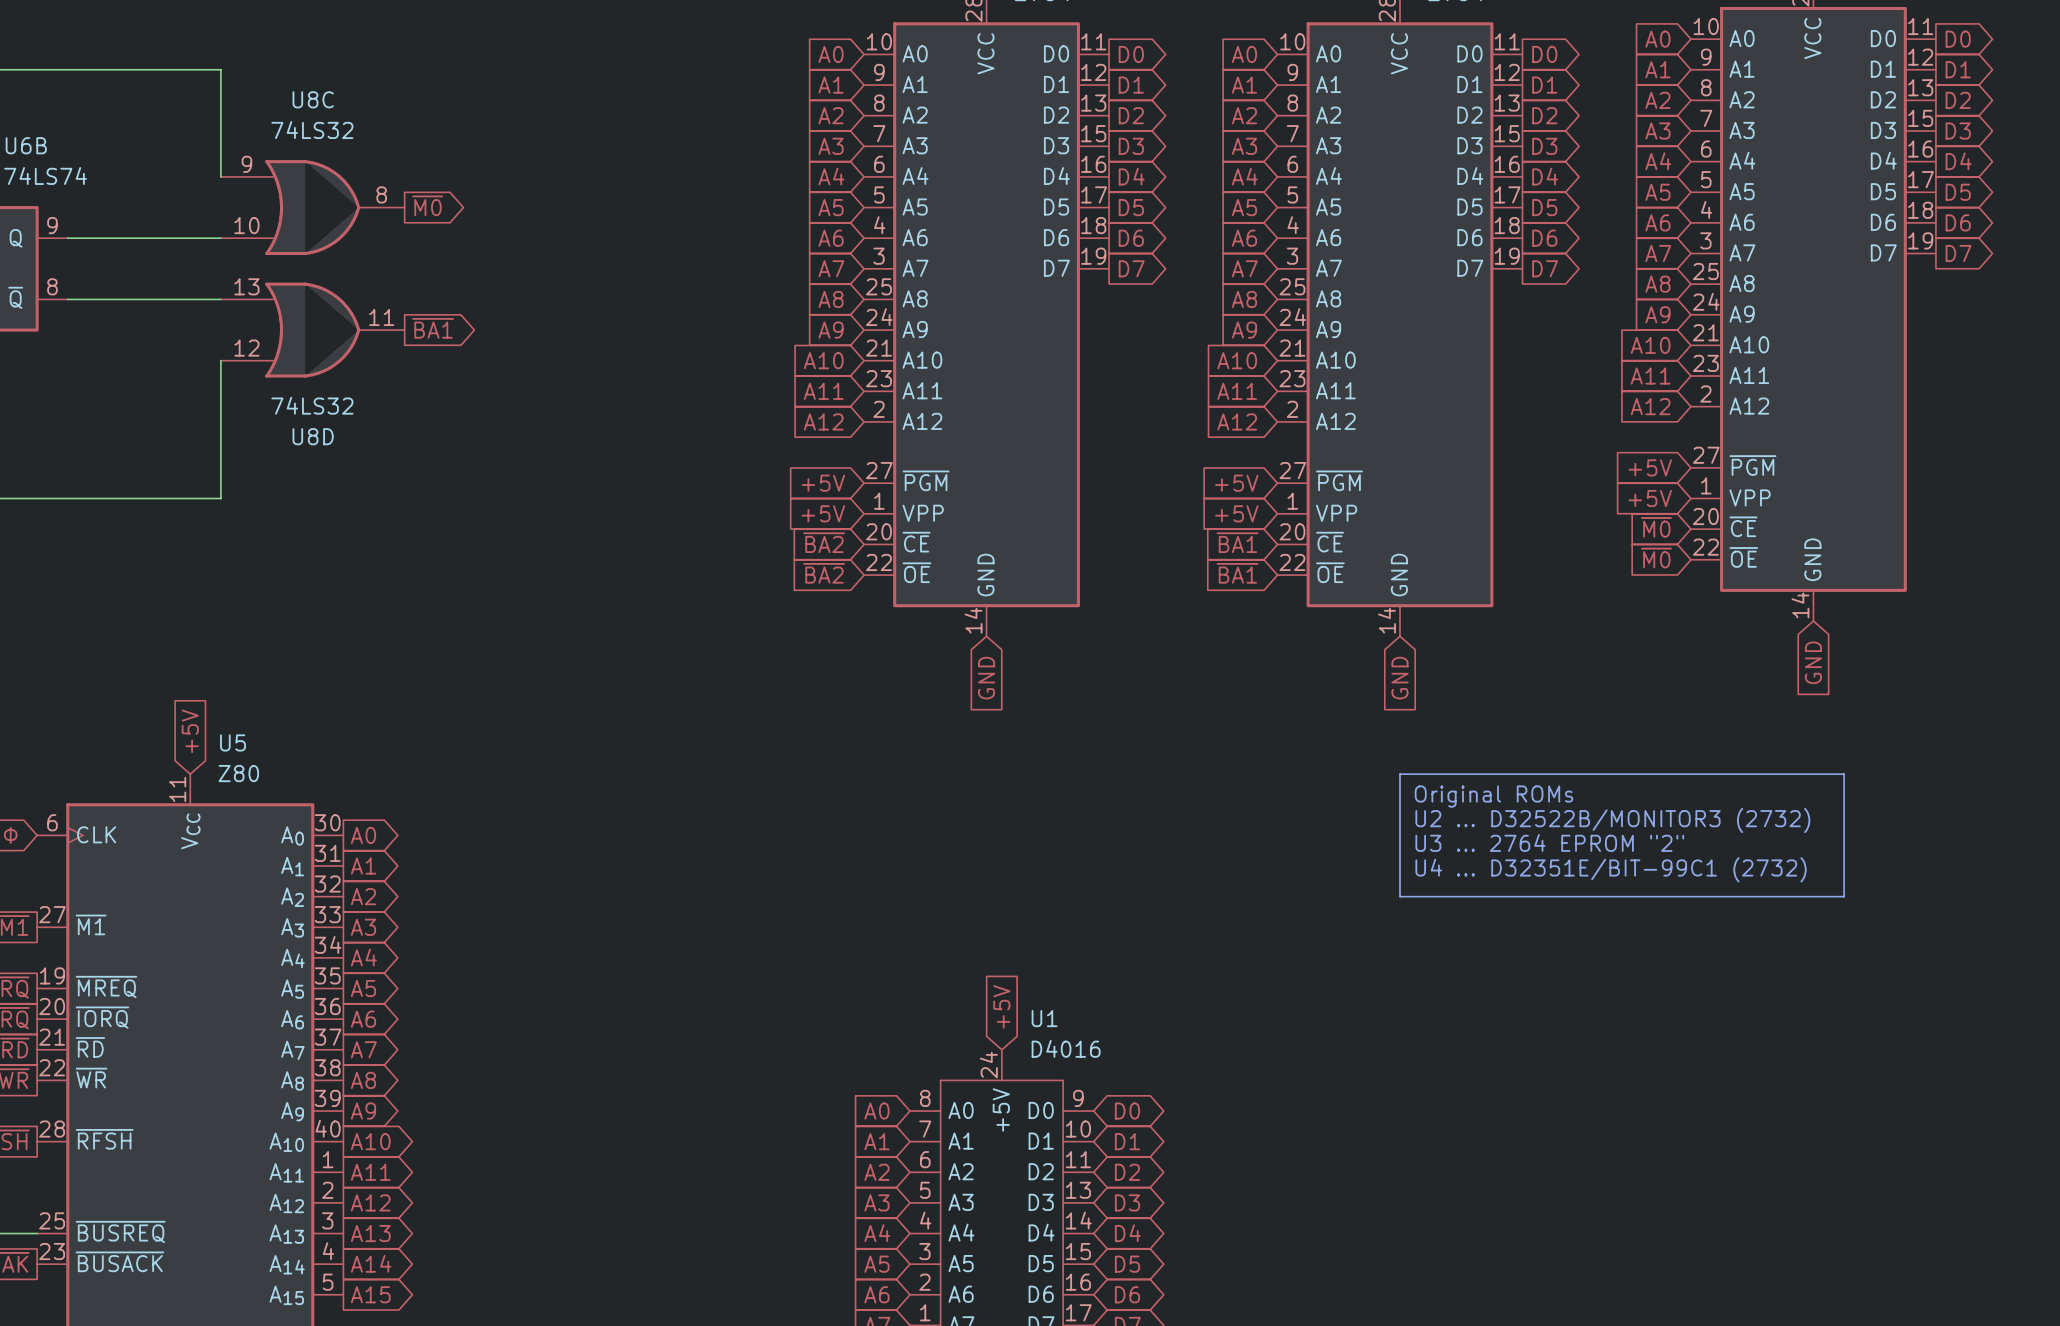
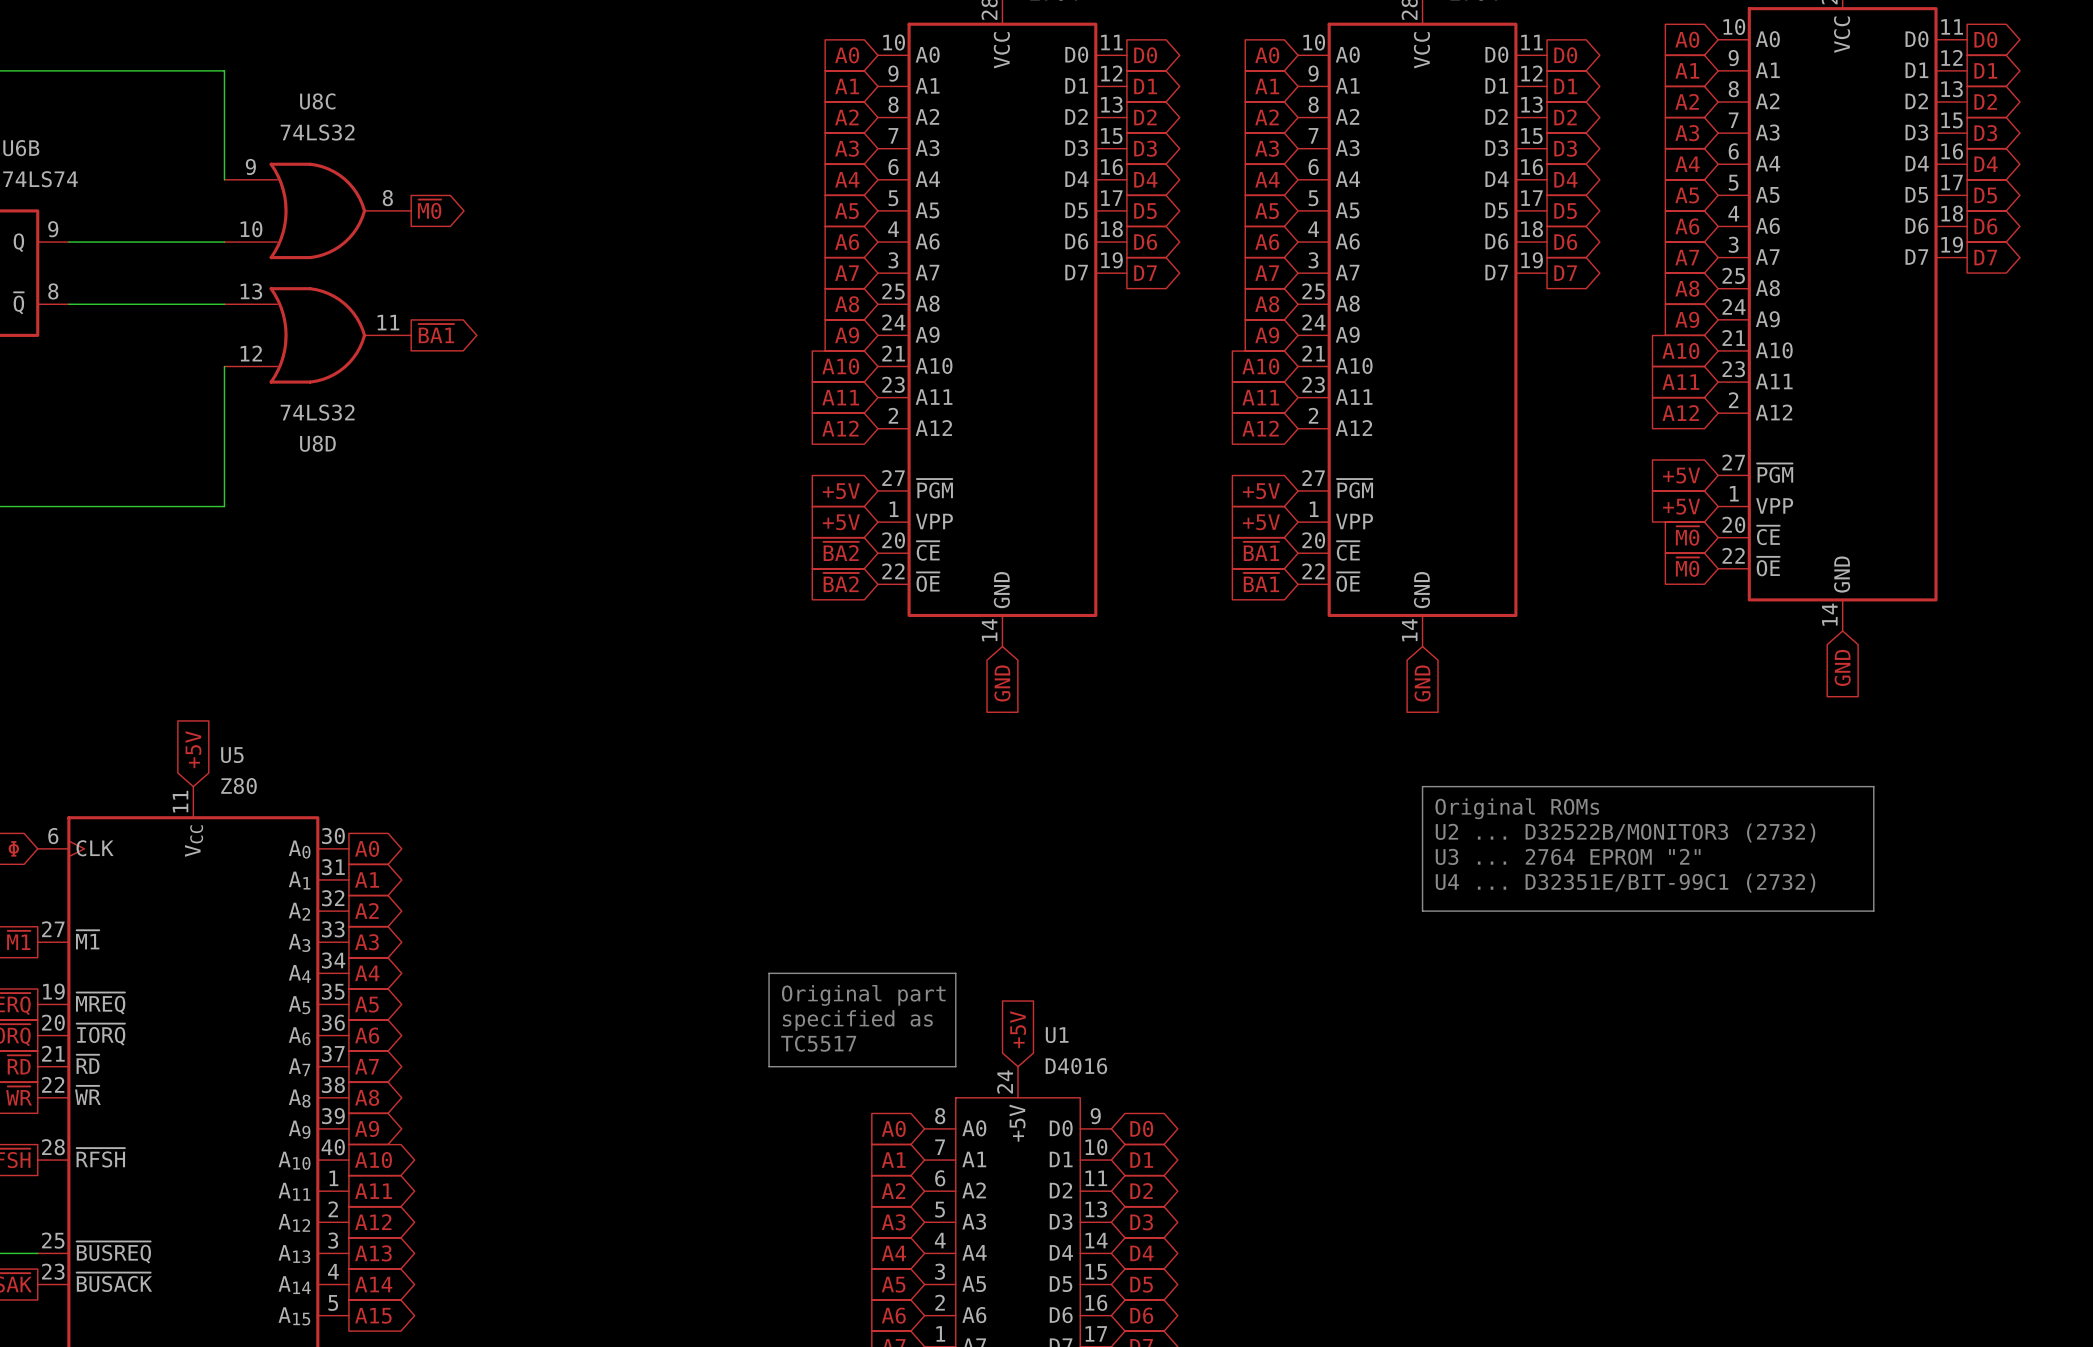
line: none -> (769, 973) (955, 973) (955, 1066) (769, 1066) (769, 973)
text: none -> Original part (863, 995)
text: none -> specified as (857, 1020)
text: none -> TC5517 (818, 1043)

